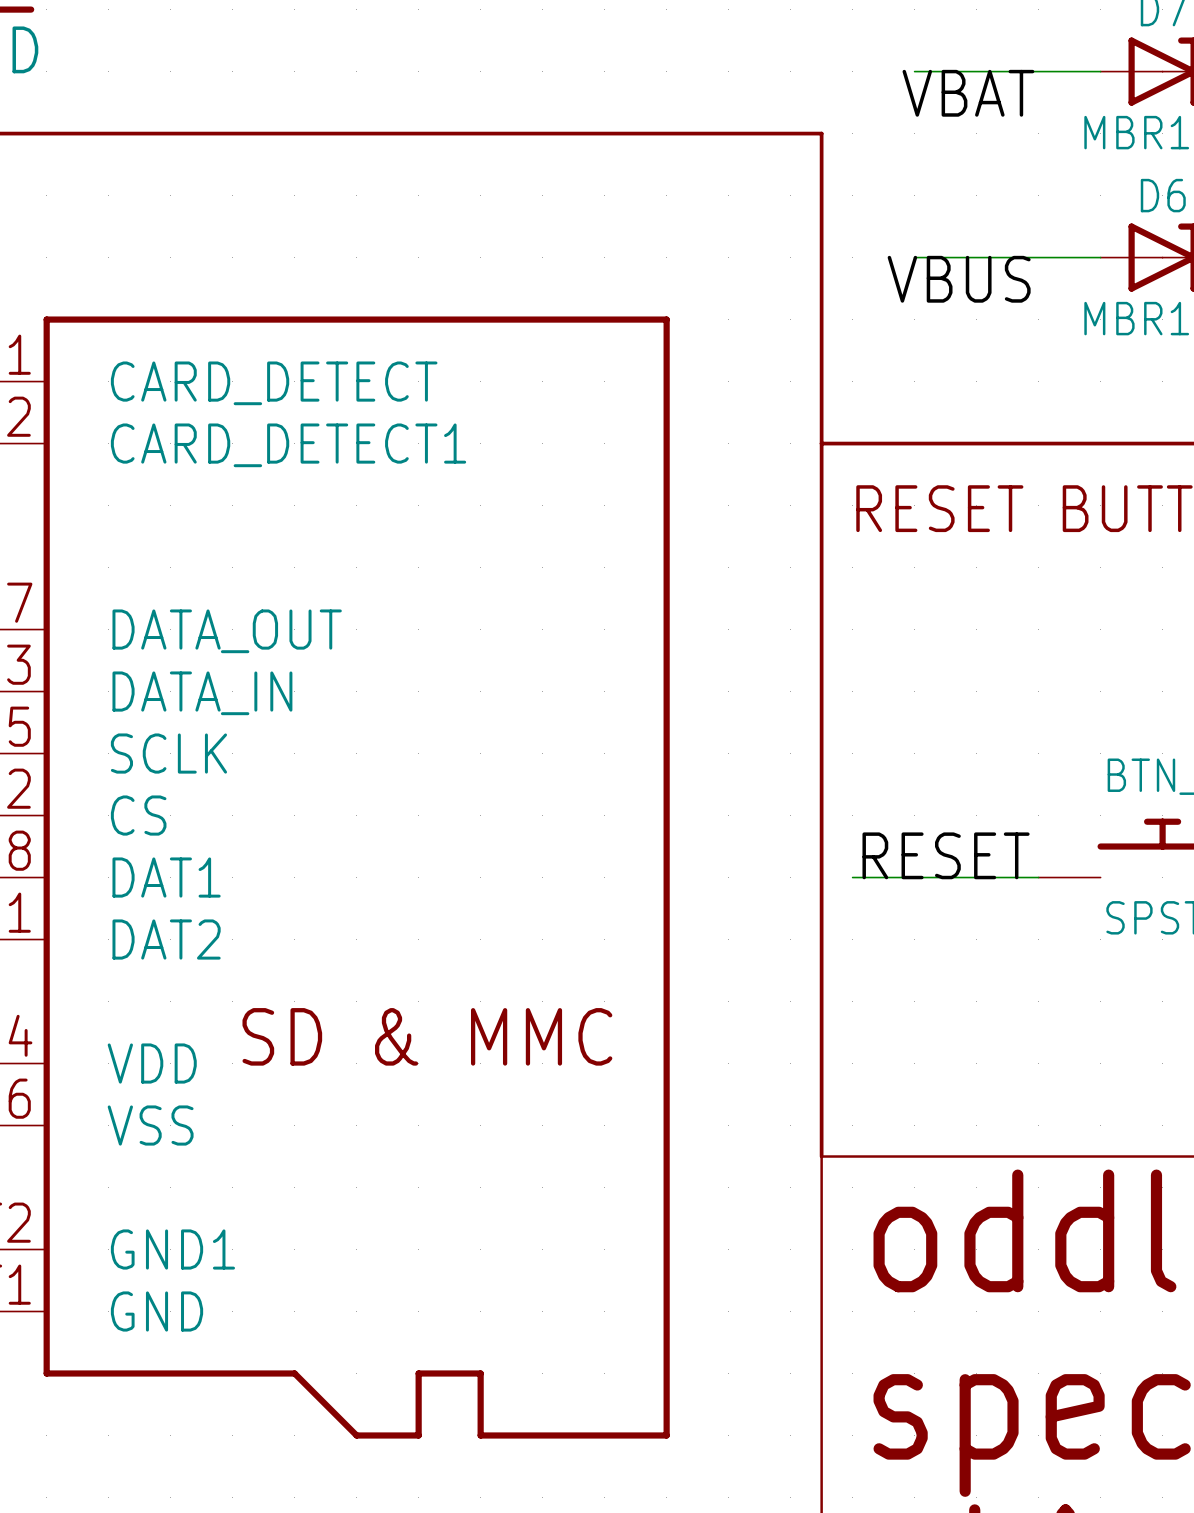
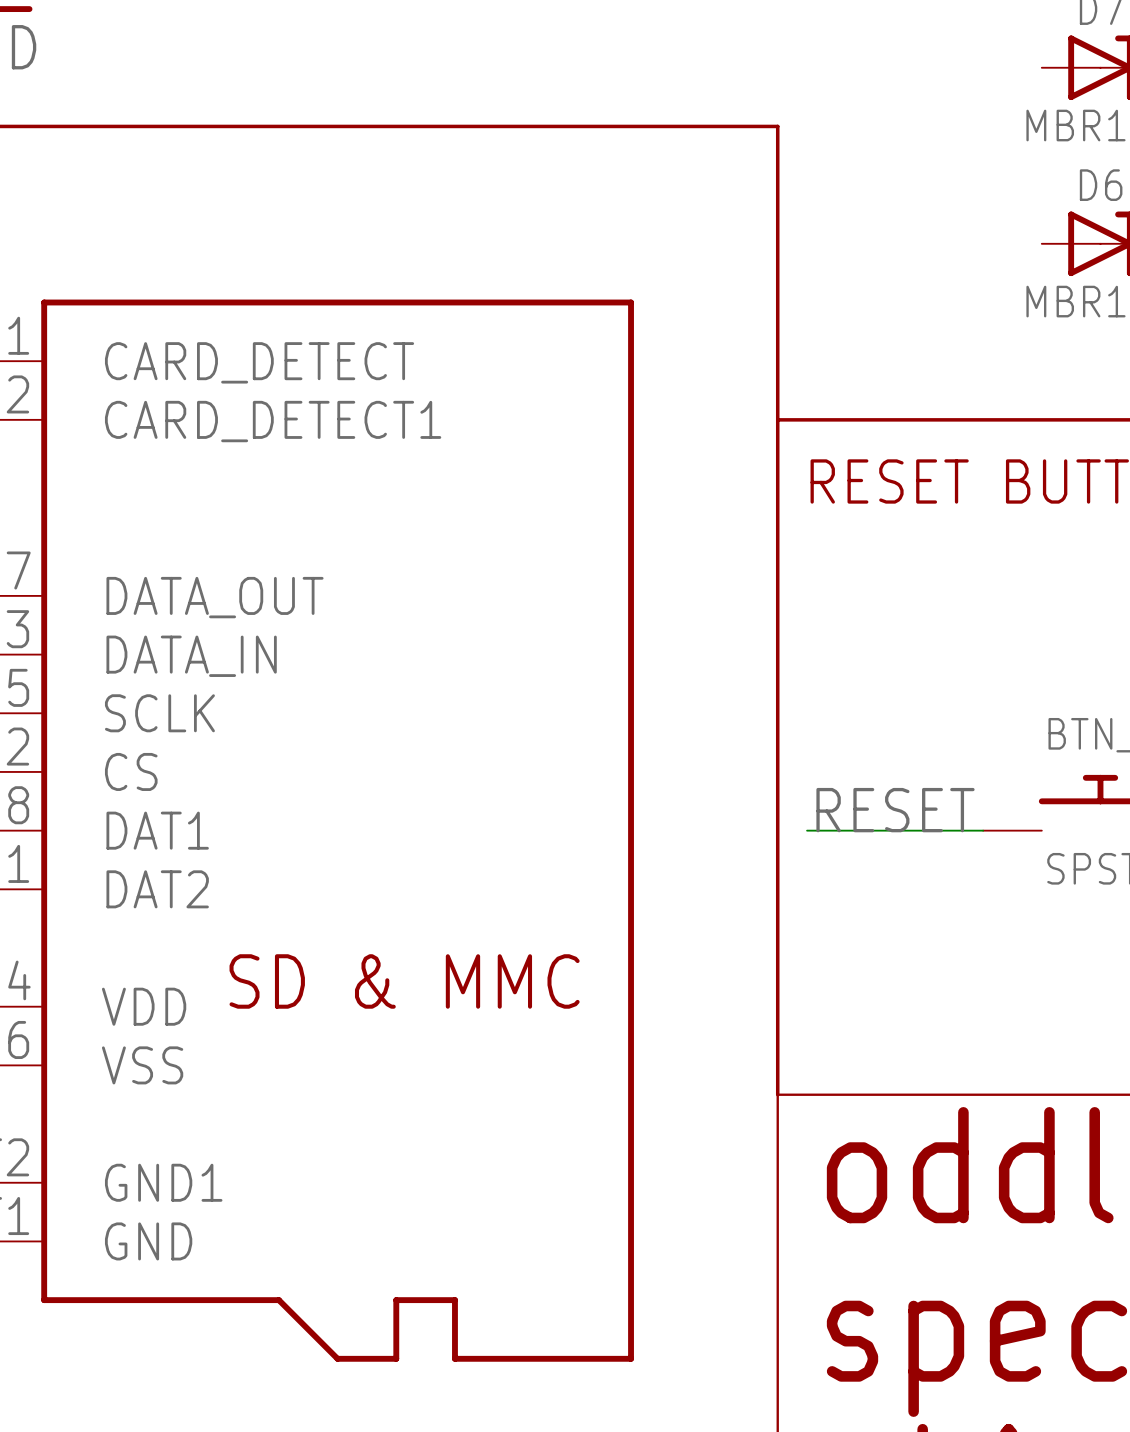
wire: (914, 71) (1100, 71) -> none
label: VBAT (968, 93) -> none
wire: (914, 257) (1100, 257) -> none
label: VBUS (959, 279) -> none

